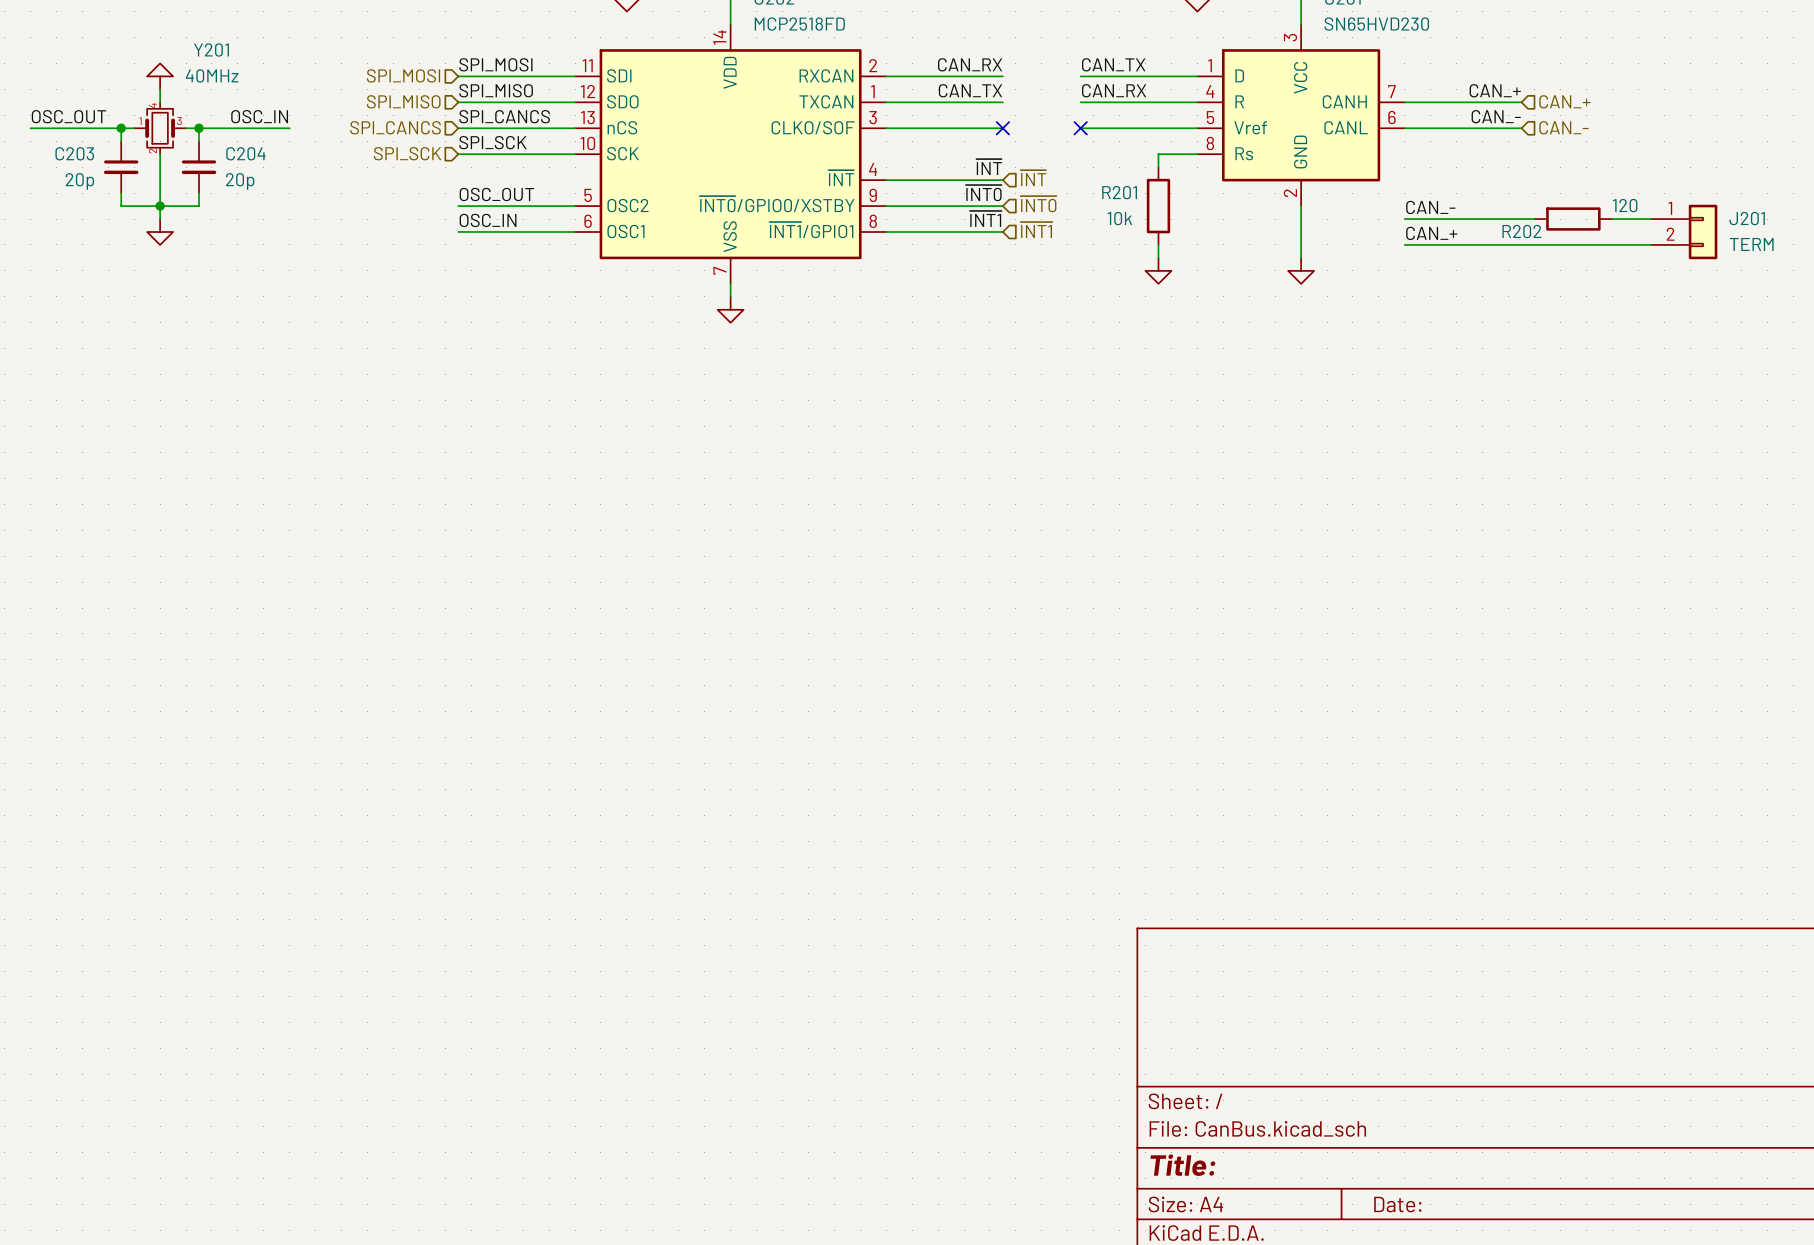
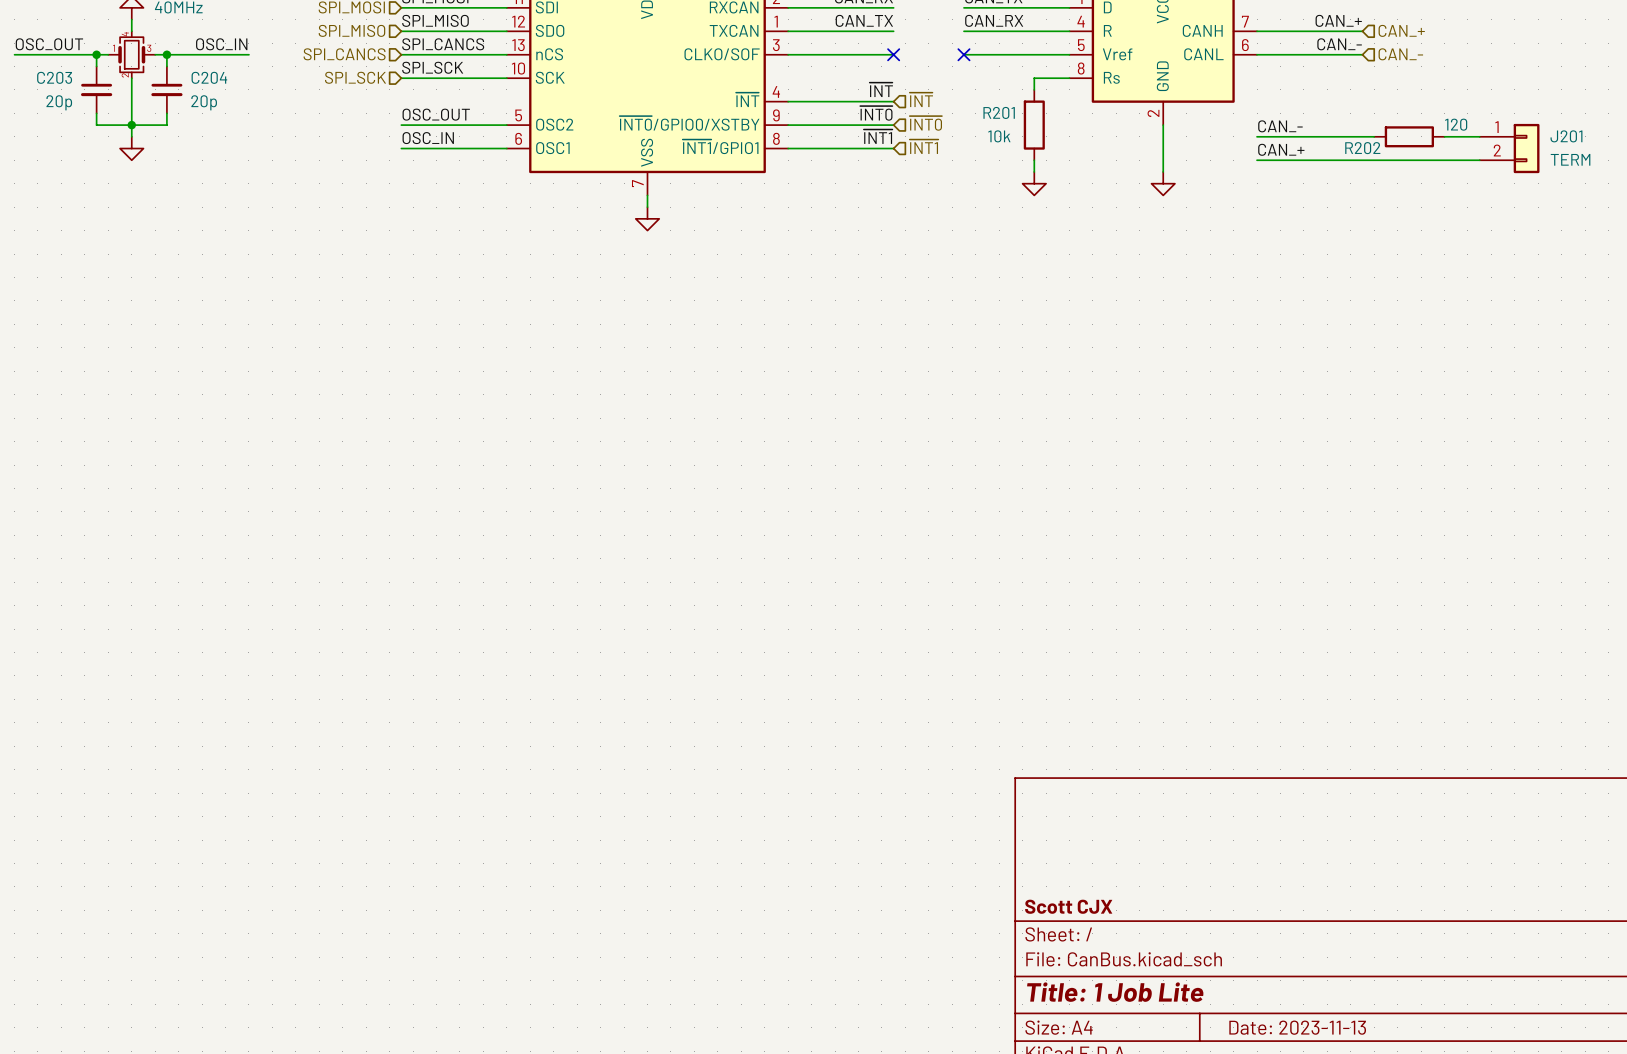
title block: none -> Scott CJX (1068, 906)
title block: Title: (1182, 1165) -> Title: 1 Job Lite (1115, 992)
title block: Date: (1397, 1204) -> Date: 2023-11-13 (1297, 1027)

